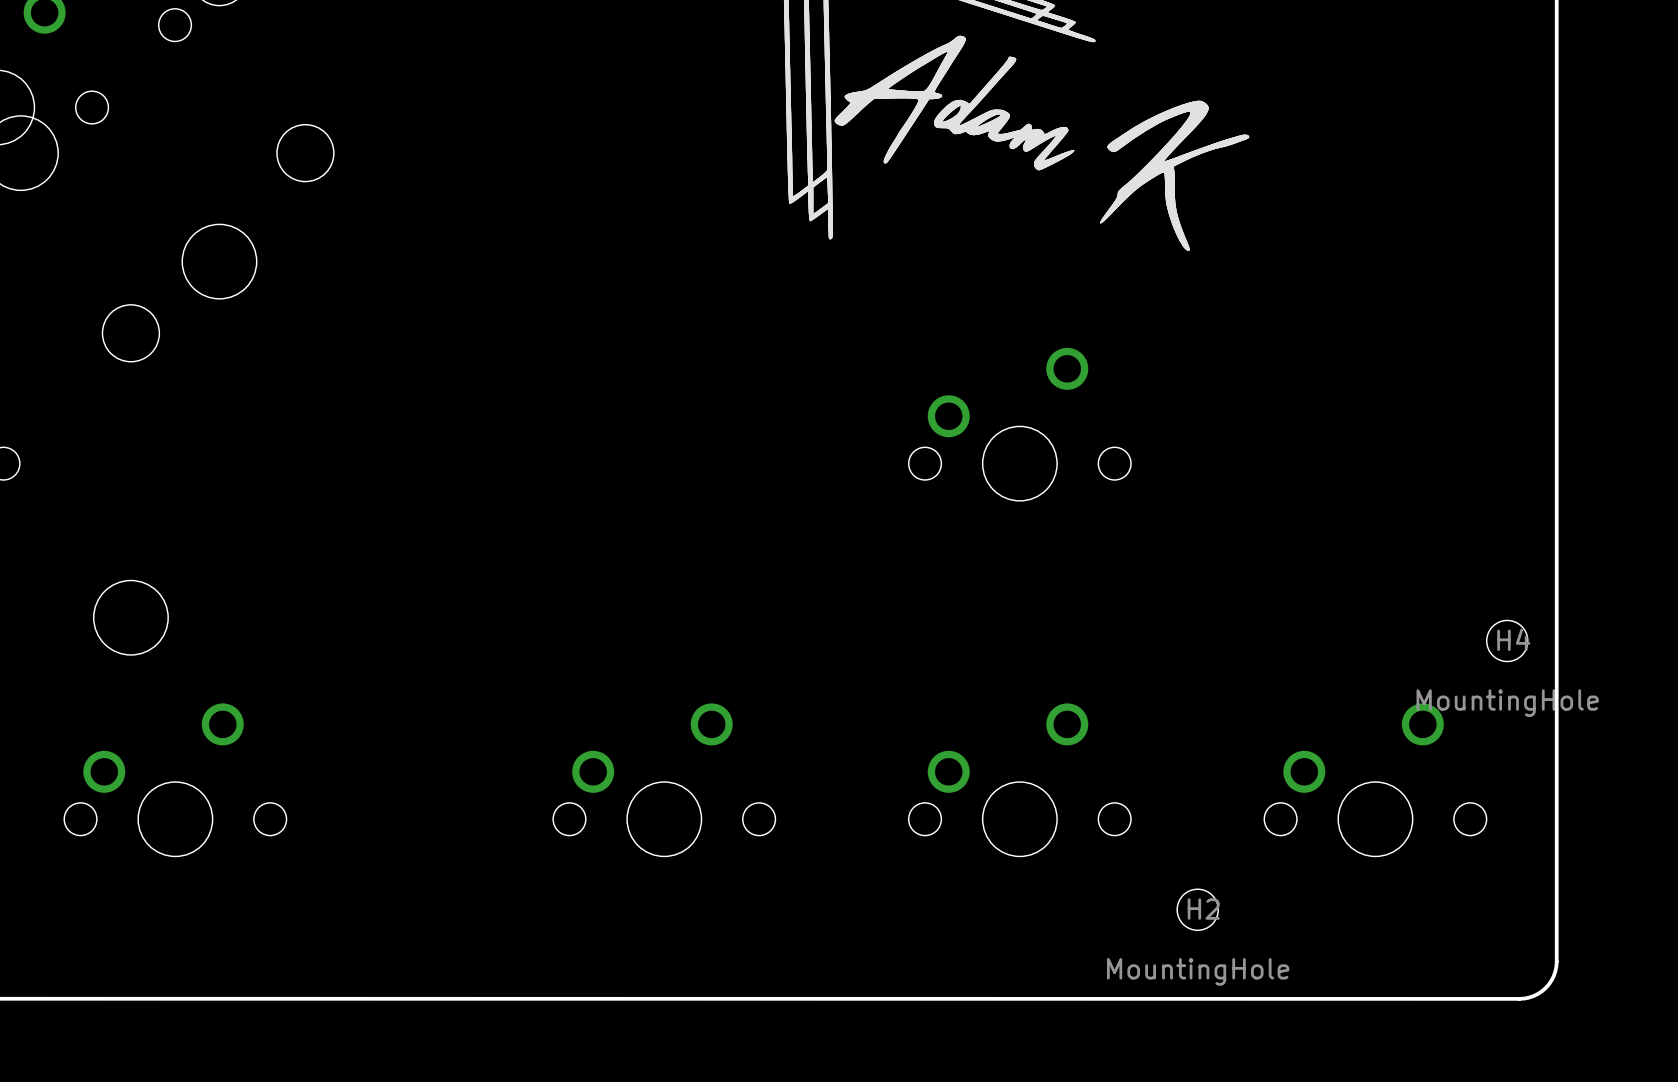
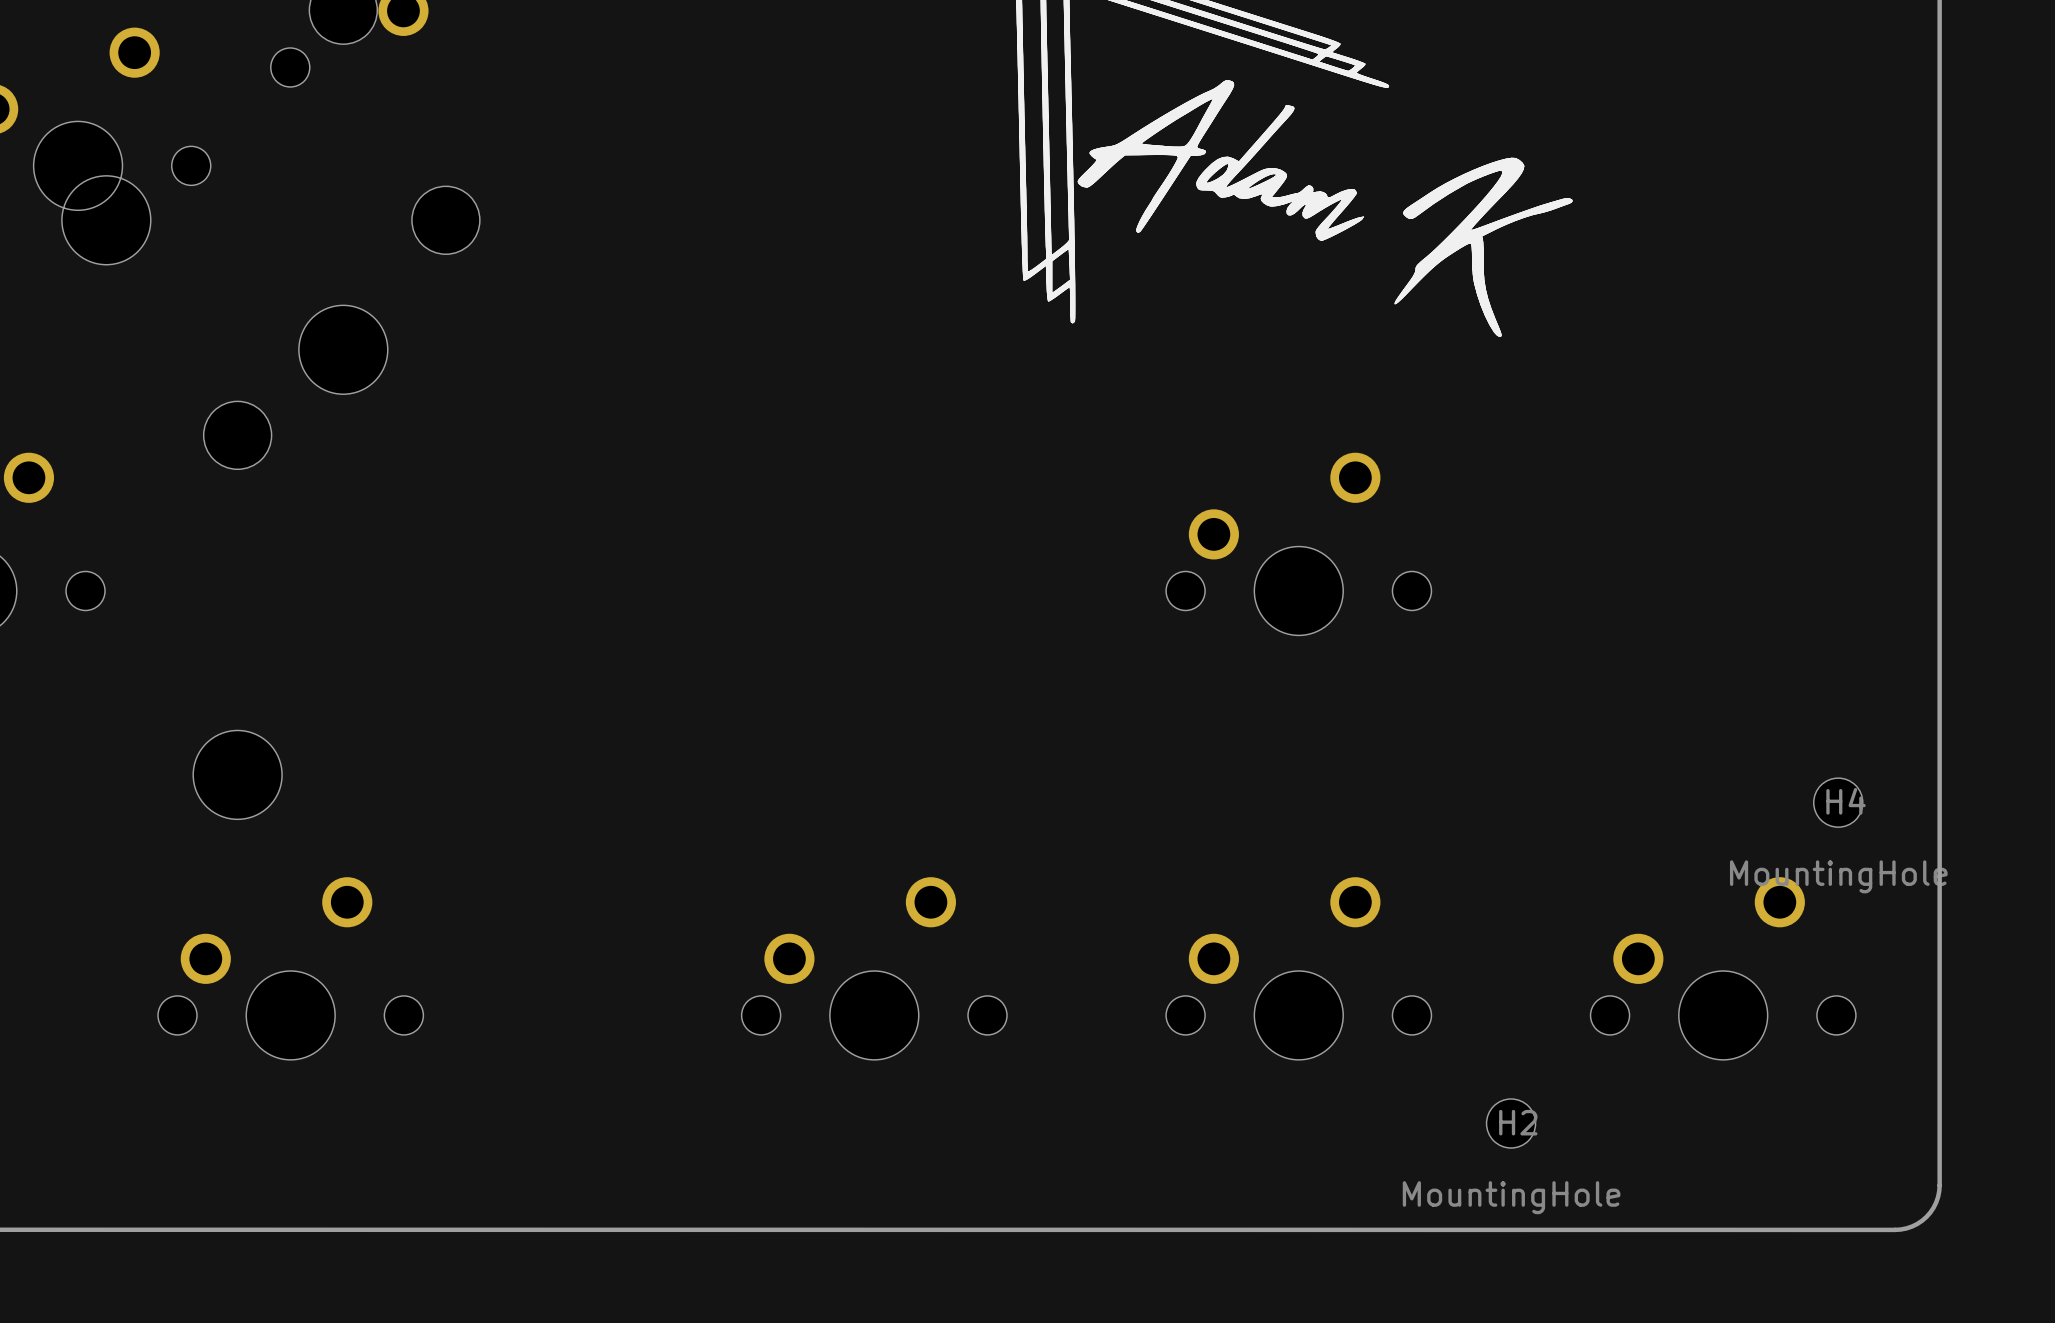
H4 position: (1507, 640) -> (1838, 802)

